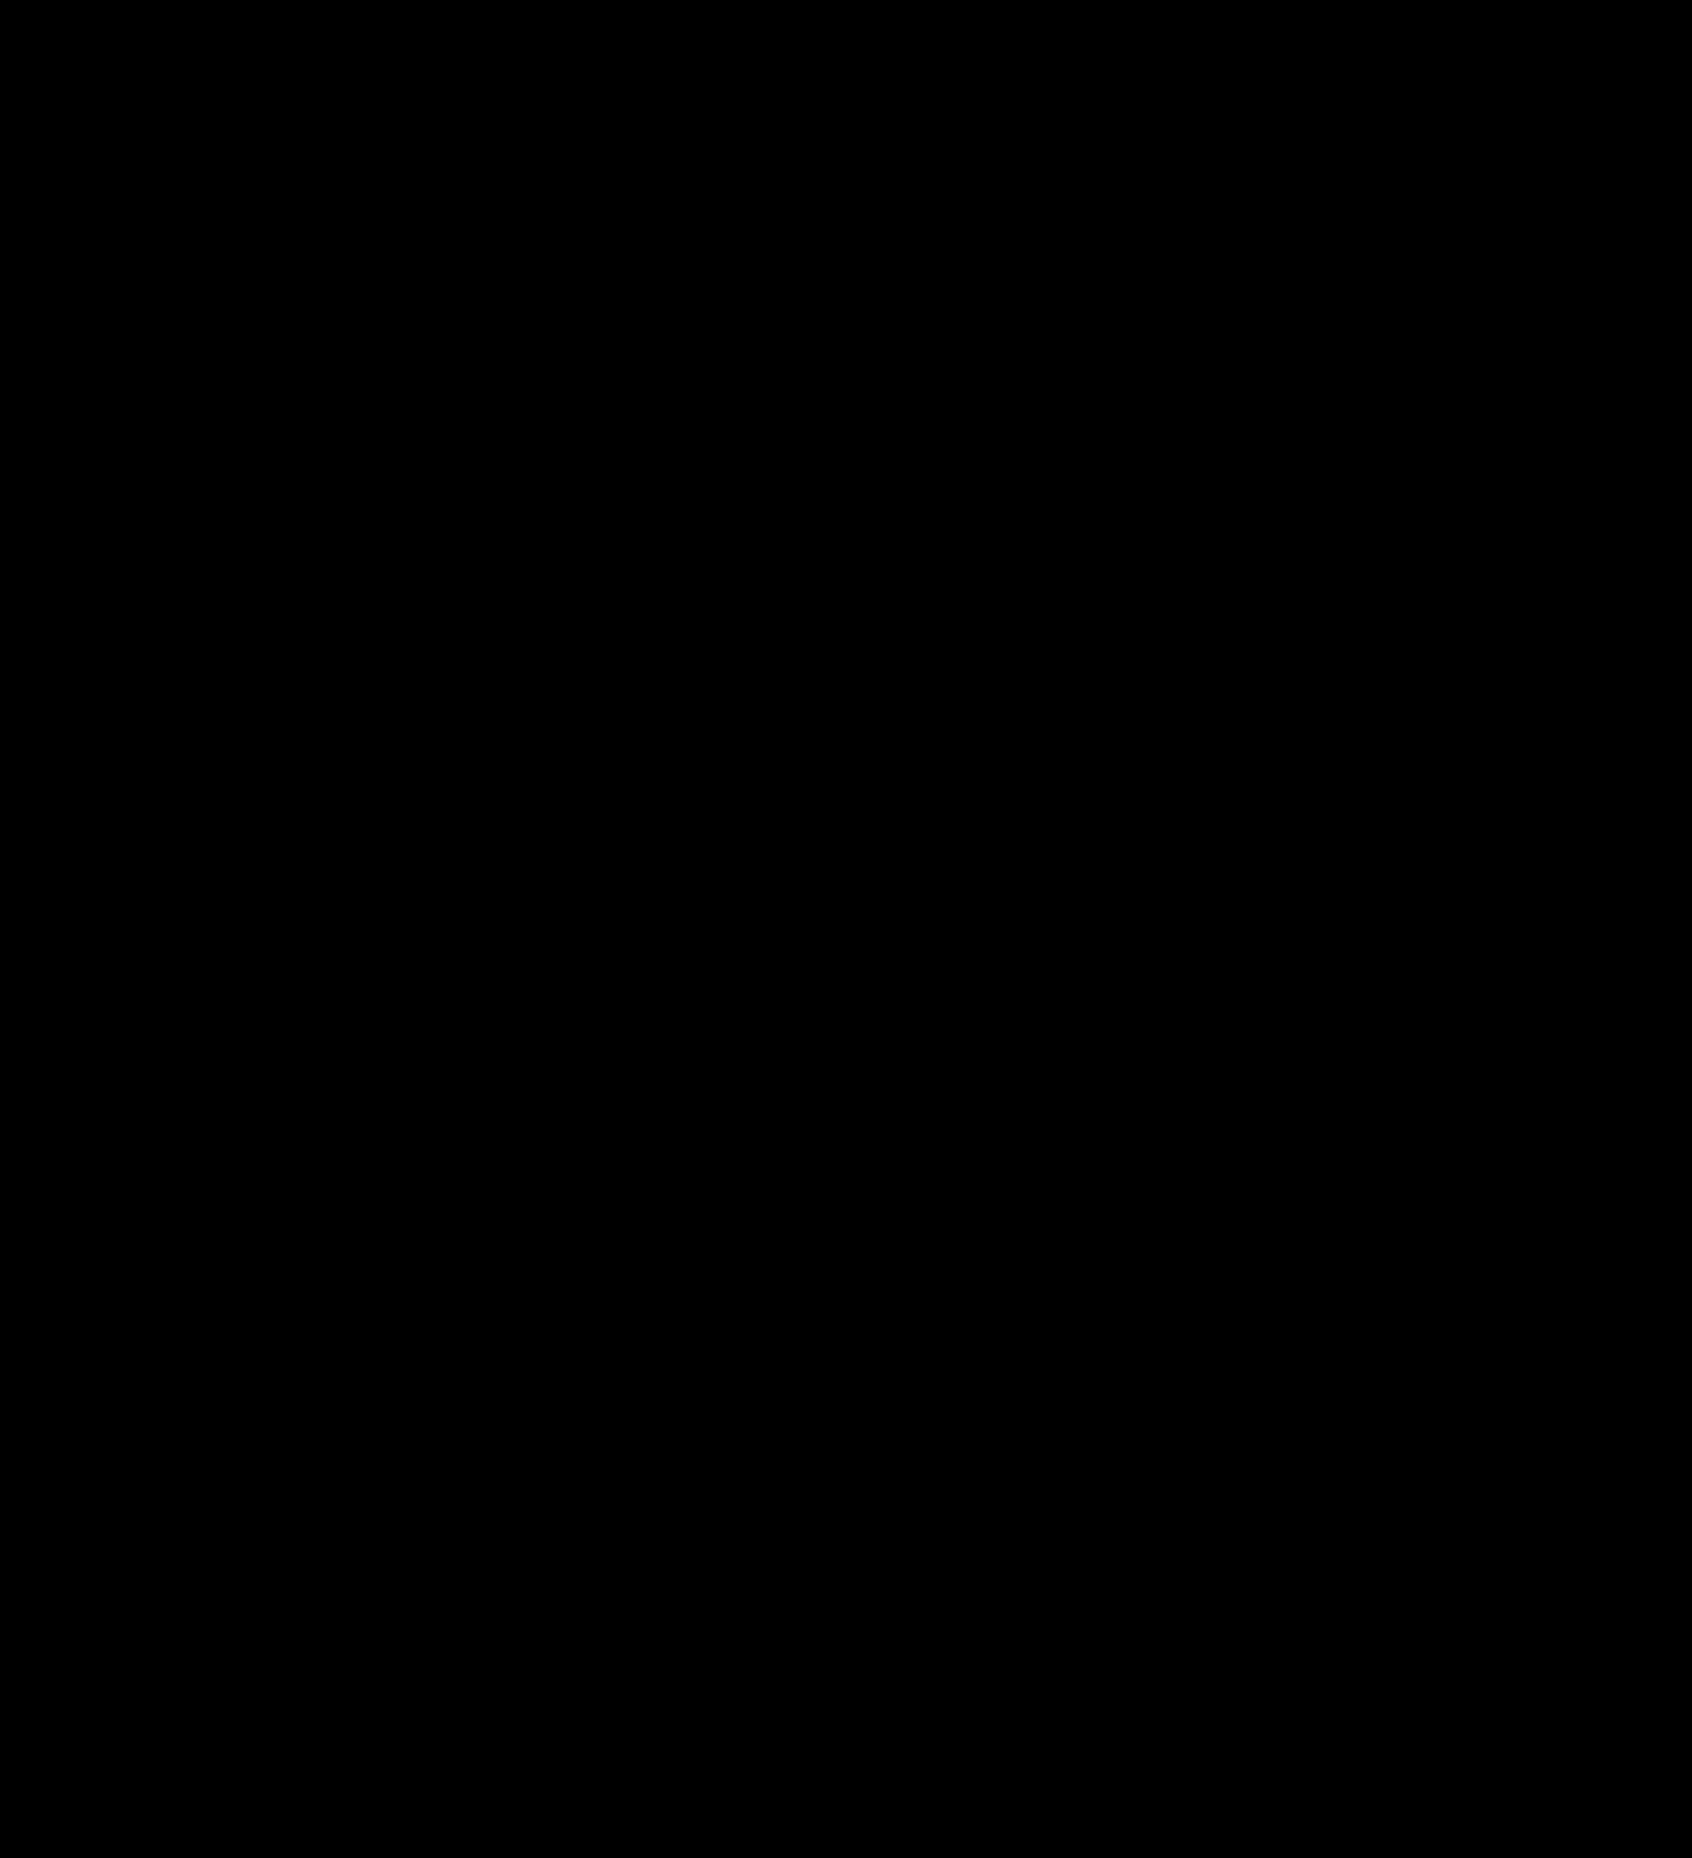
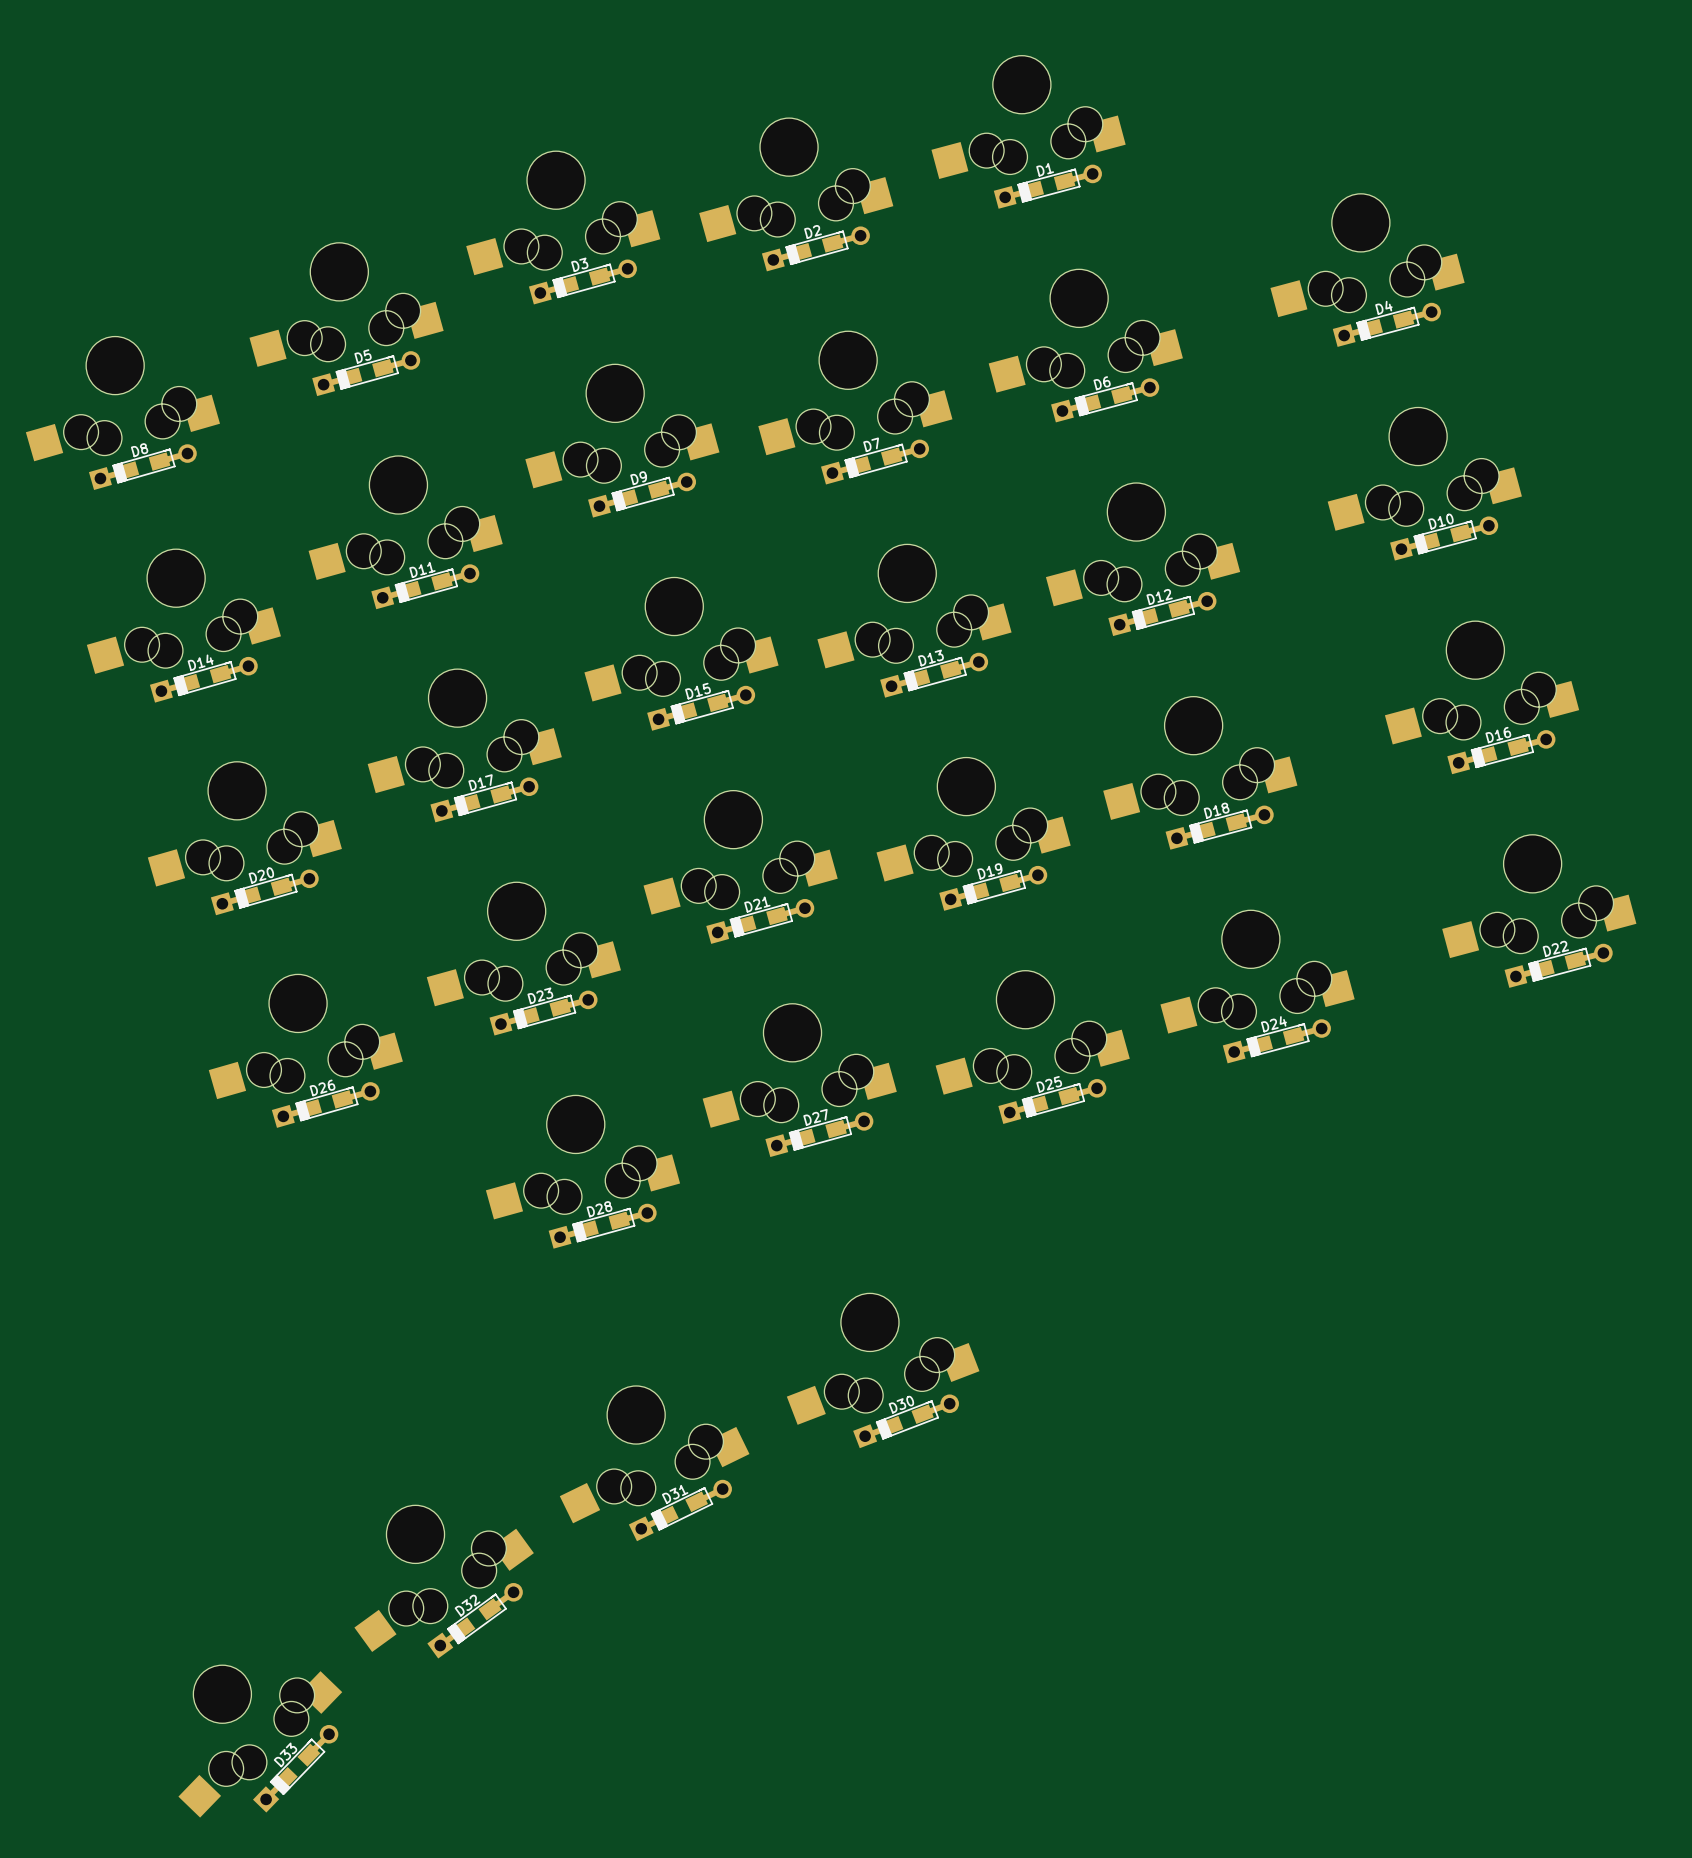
part: none -> (1028, 117)
part: none -> (796, 180)
D1: none -> (1047, 186)
part: none -> (563, 213)
D2: none -> (815, 248)
part: none -> (1367, 255)
D3: none -> (582, 281)
part: none -> (346, 304)
D4: none -> (1386, 324)
part: none -> (1085, 330)
D5: none -> (366, 373)
part: none -> (855, 393)
part: none -> (122, 398)
D6: none -> (1105, 400)
part: none -> (622, 426)
D7: none -> (875, 462)
D8: none -> (142, 467)
part: none -> (1424, 469)
D9: none -> (642, 495)
part: none -> (405, 517)
D10: none -> (1444, 538)
part: none -> (1143, 544)
D11: none -> (425, 586)
part: none -> (914, 606)
part: none -> (183, 611)
D12: none -> (1162, 614)
part: none -> (681, 639)
D13: none -> (934, 675)
D14: none -> (203, 679)
part: none -> (1482, 682)
D15: none -> (701, 708)
part: none -> (464, 731)
D16: none -> (1501, 752)
part: none -> (1200, 758)
D17: none -> (484, 799)
part: none -> (973, 819)
part: none -> (244, 824)
D18: none -> (1219, 827)
part: none -> (740, 852)
D19: none -> (993, 888)
D20: none -> (264, 892)
part: none -> (1539, 896)
D21: none -> (760, 921)
part: none -> (523, 944)
D22: none -> (1558, 965)
part: none -> (1257, 971)
D23: none -> (543, 1013)
part: none -> (1032, 1032)
part: none -> (305, 1036)
D24: none -> (1276, 1041)
part: none -> (799, 1065)
D25: none -> (1052, 1101)
D26: none -> (325, 1105)
D27: none -> (819, 1134)
part: none -> (583, 1157)
D28: none -> (602, 1226)
part: none -> (883, 1359)
D30: none -> (906, 1421)
part: none -> (654, 1454)
D31: none -> (680, 1510)
part: none -> (444, 1578)
D32: none -> (475, 1620)
part: none -> (260, 1741)
D33: none -> (295, 1768)

